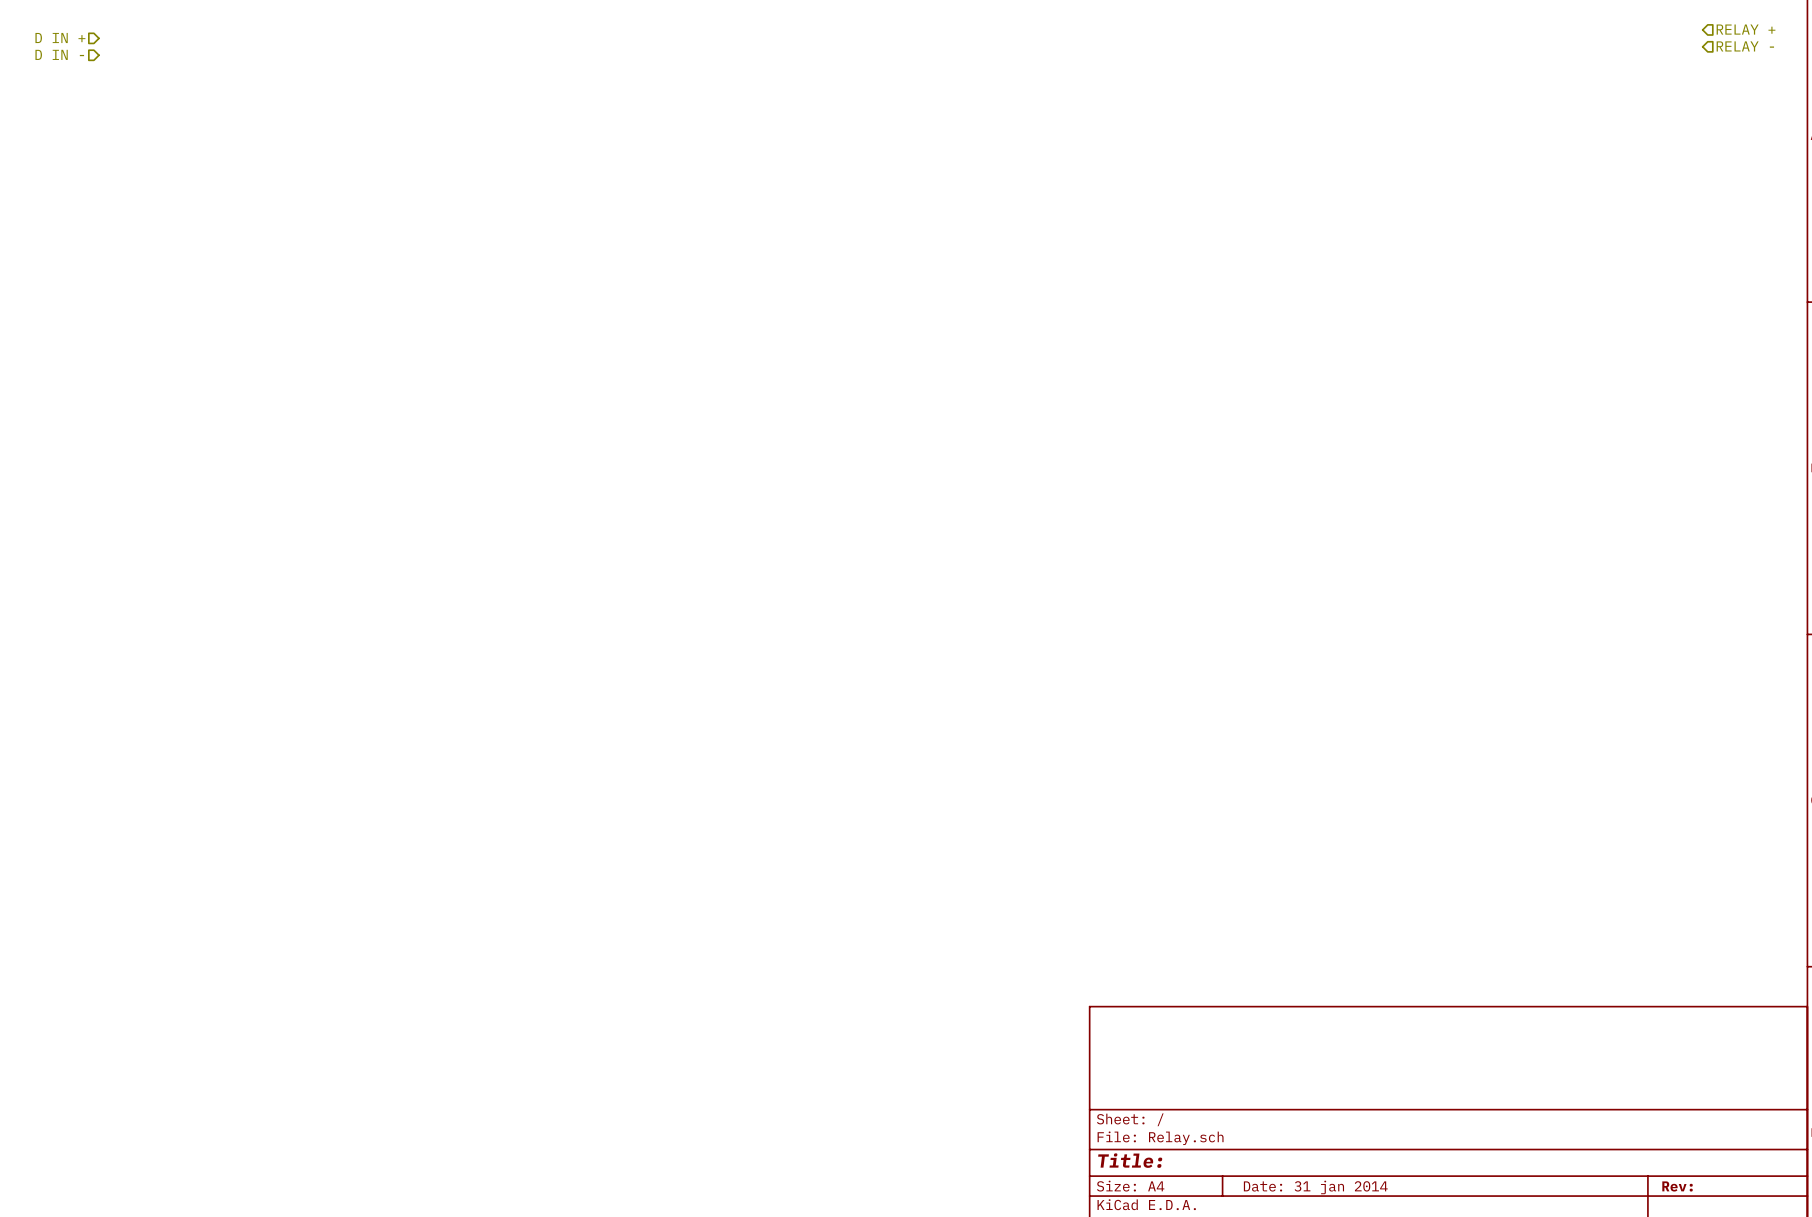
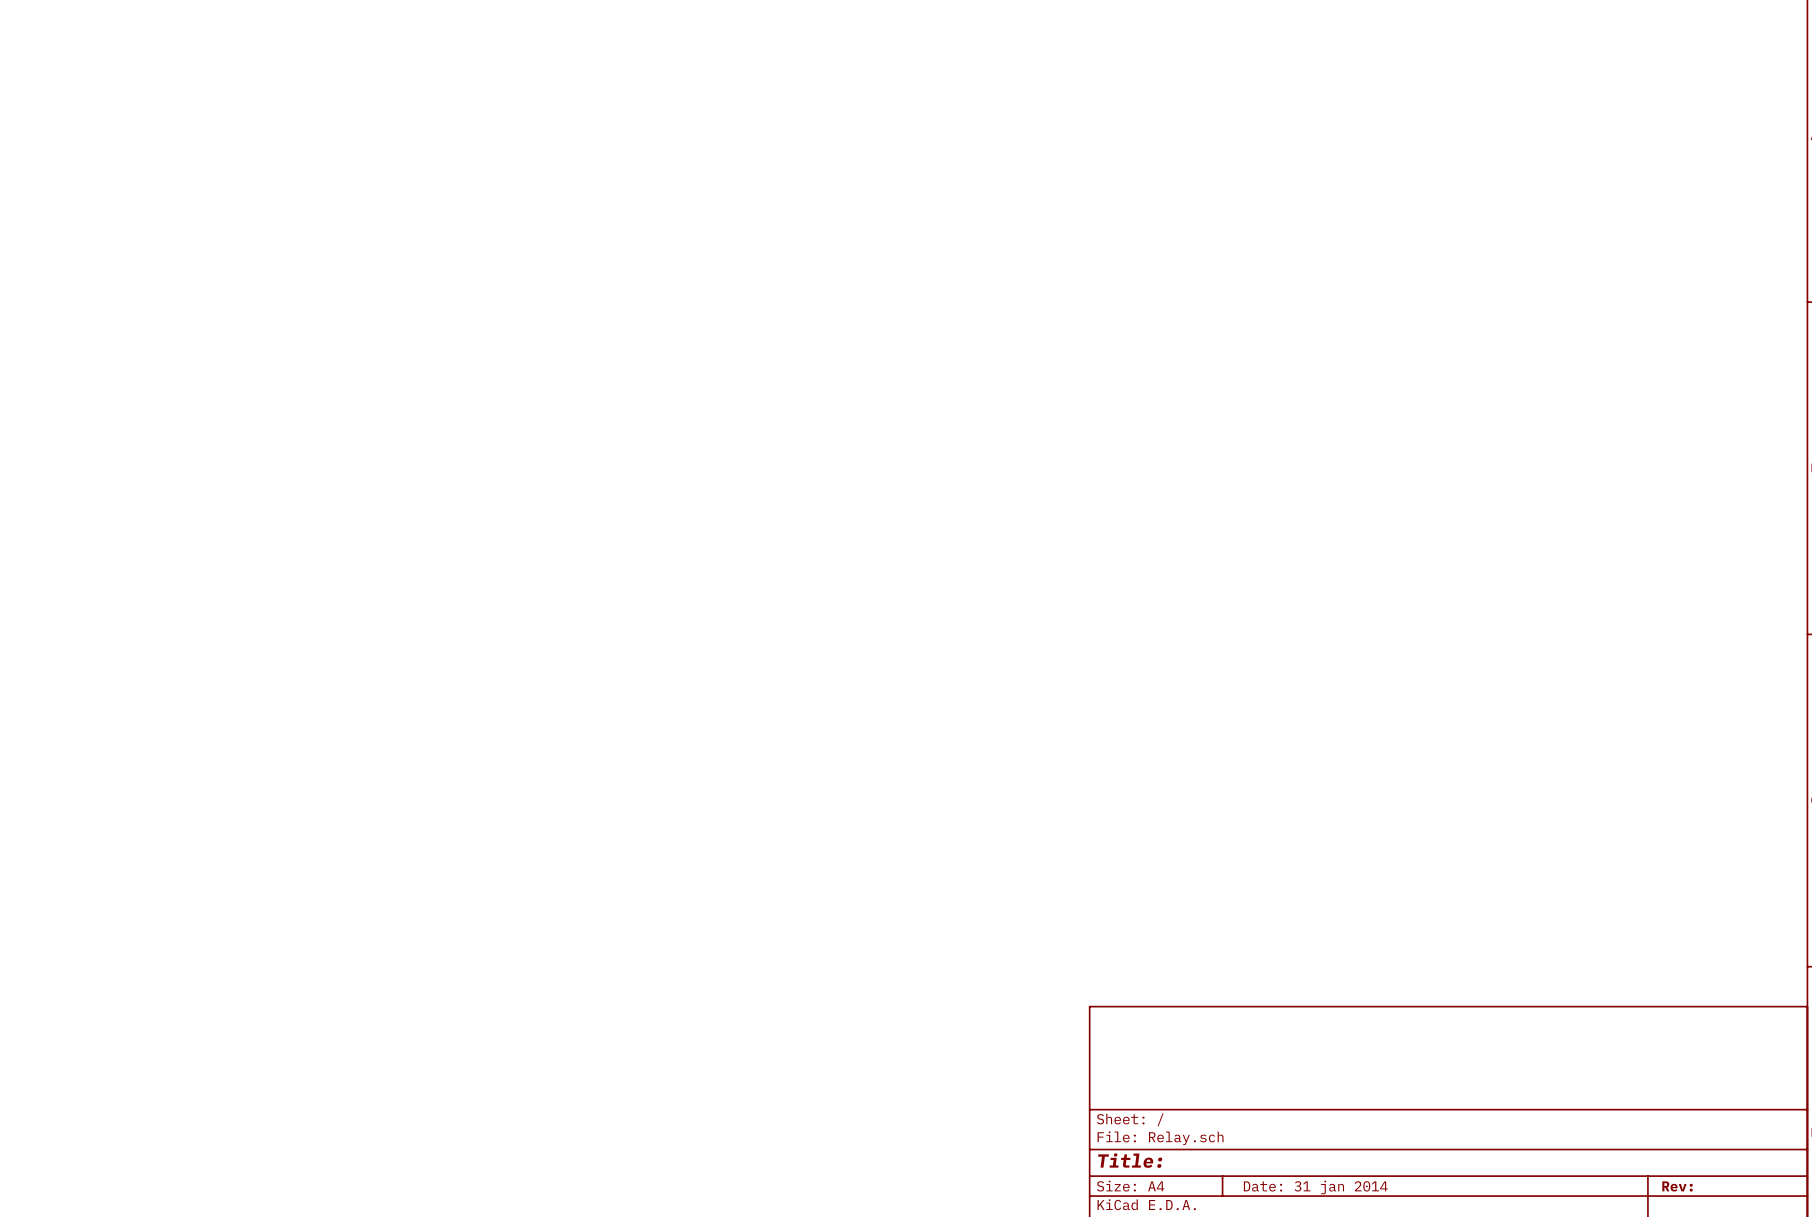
hierarchical label: RELAY + (1746, 29) -> none
hierarchical label: D IN + (60, 38) -> none
hierarchical label: RELAY - (1745, 46) -> none
hierarchical label: D IN - (59, 54) -> none

